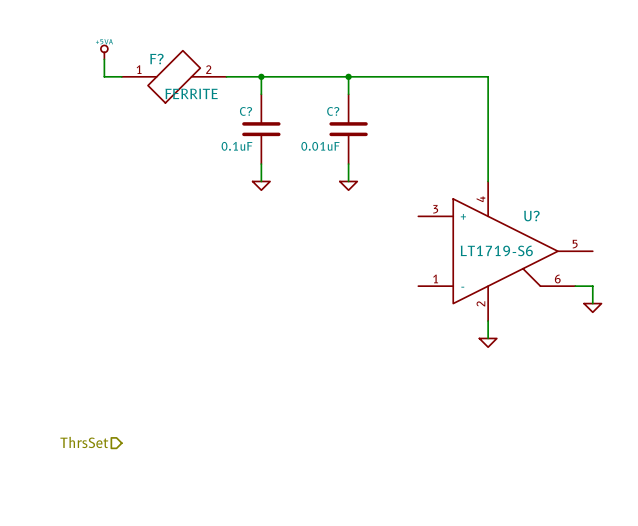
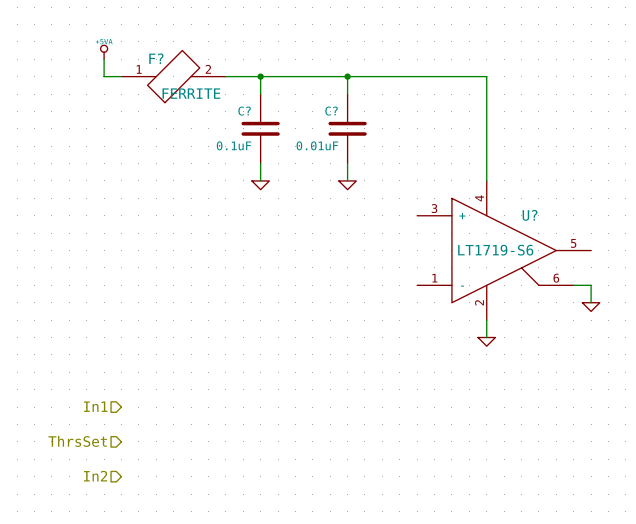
hierarchical label: none -> In1 (95, 406)
hierarchical label: none -> In2 (95, 476)

